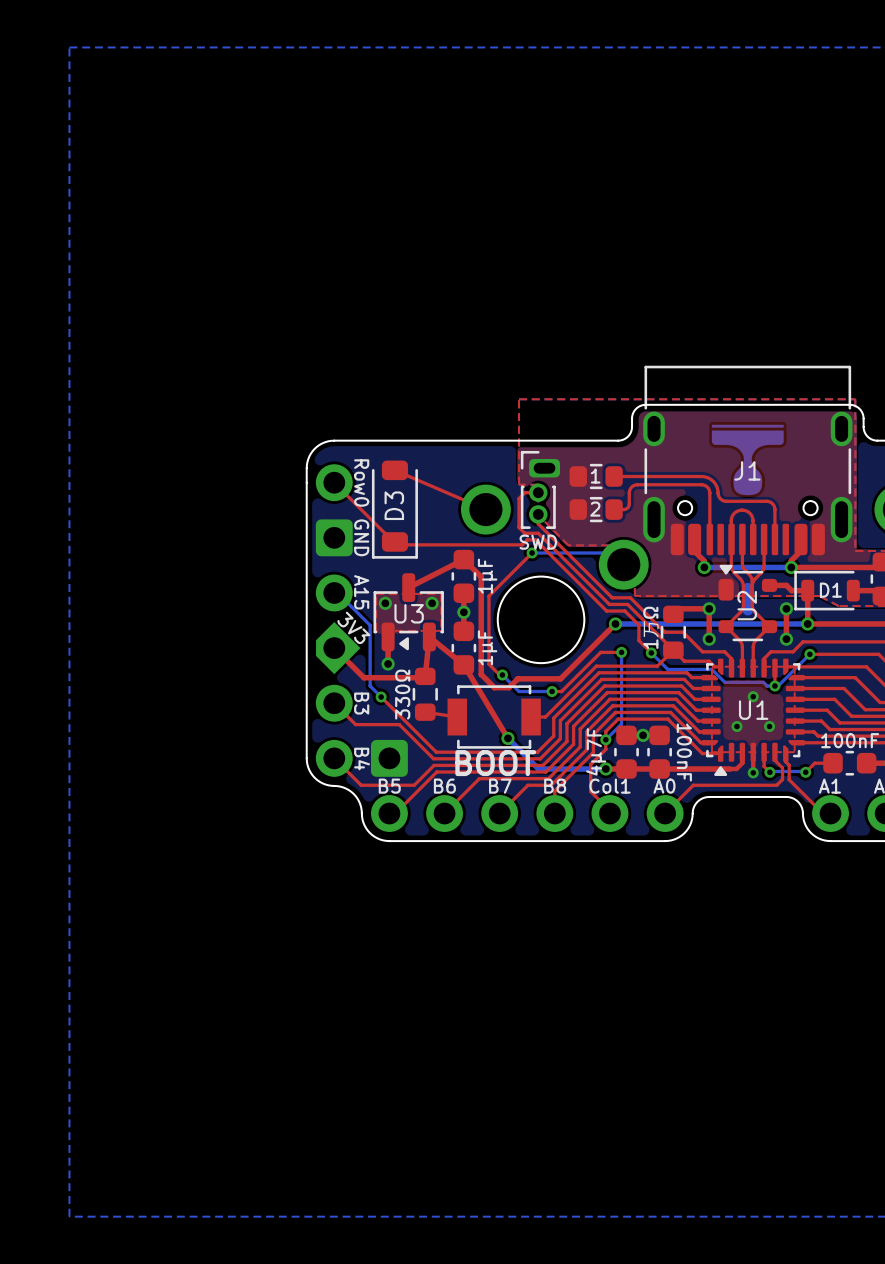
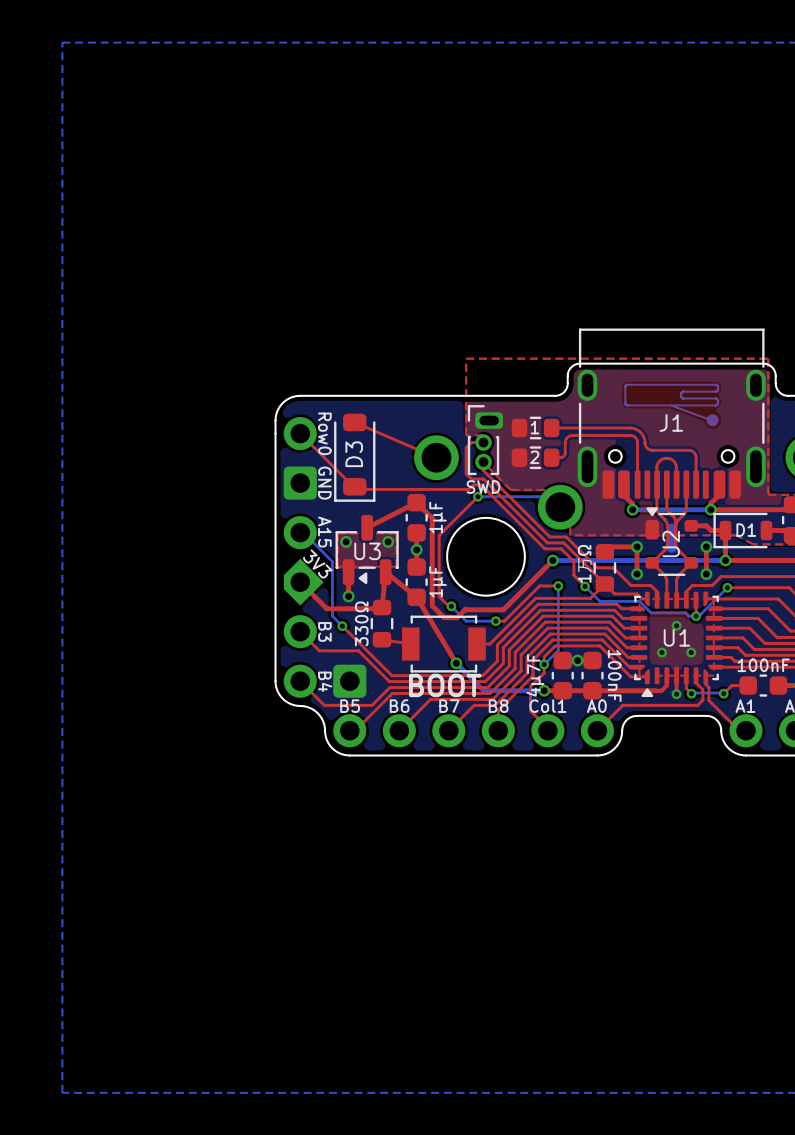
drawing: [711, 424, 784, 496] -> none
bottom track: none -> (627, 384) (715, 384)
bottom track: none -> (625, 387) (625, 402)
bottom track: none -> (683, 391) (715, 391)
bottom track: none -> (683, 398) (715, 398)
bottom track: none -> (627, 405) (715, 405)
bottom track: none -> (671, 405) (712, 420)
drawing: none -> [706, 414, 719, 427]

